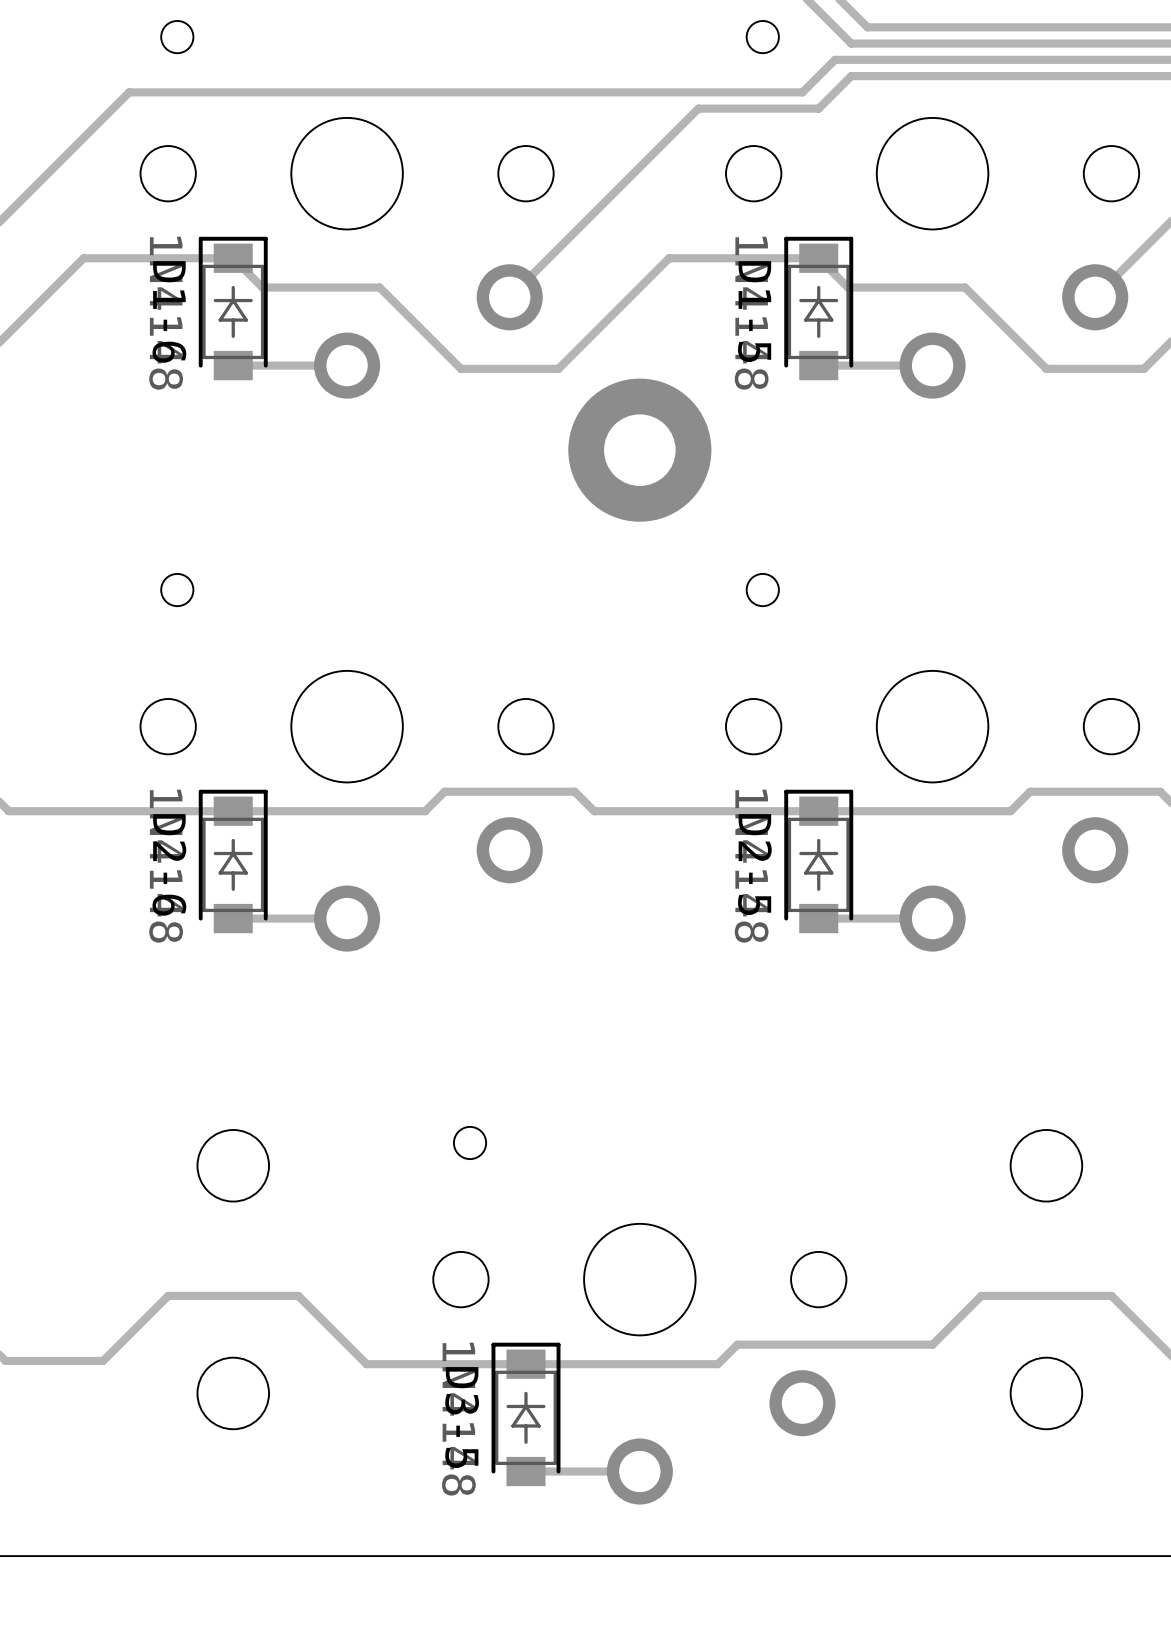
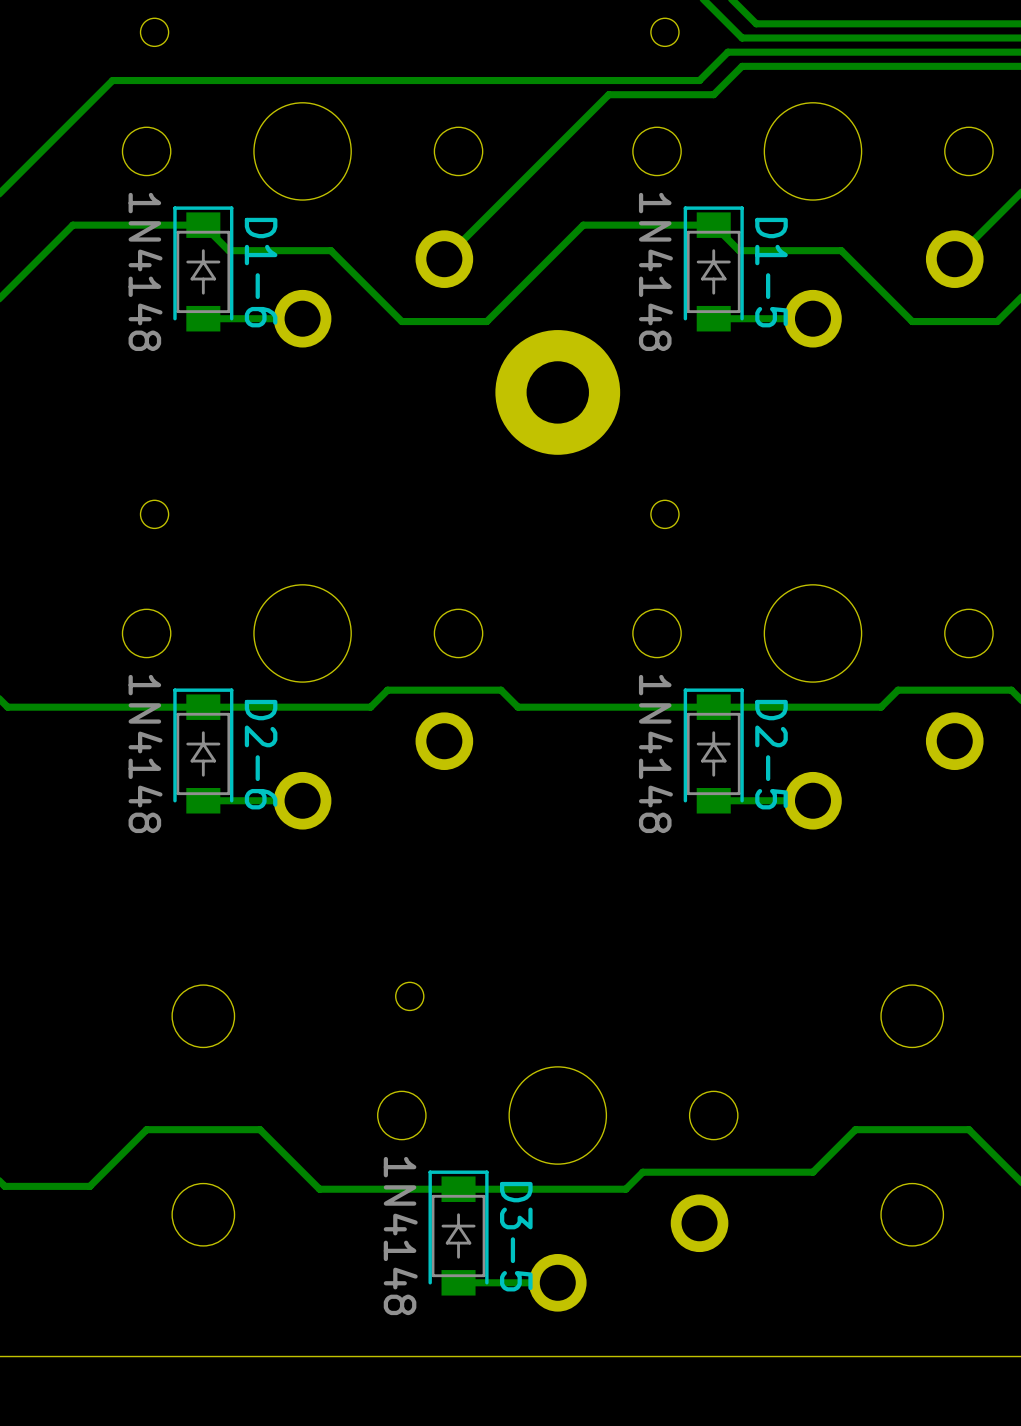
D1-6 name position: D1-6 (169, 311) -> D1-6 (261, 272)
D1-5 name position: D1-5 (754, 311) -> D1-5 (771, 272)
D2-6 name position: D2-6 (169, 864) -> D2-6 (261, 754)
D2-5 name position: D2-5 (754, 864) -> D2-5 (771, 754)
D3-5 name position: D3-5 (462, 1417) -> D3-5 (516, 1236)

